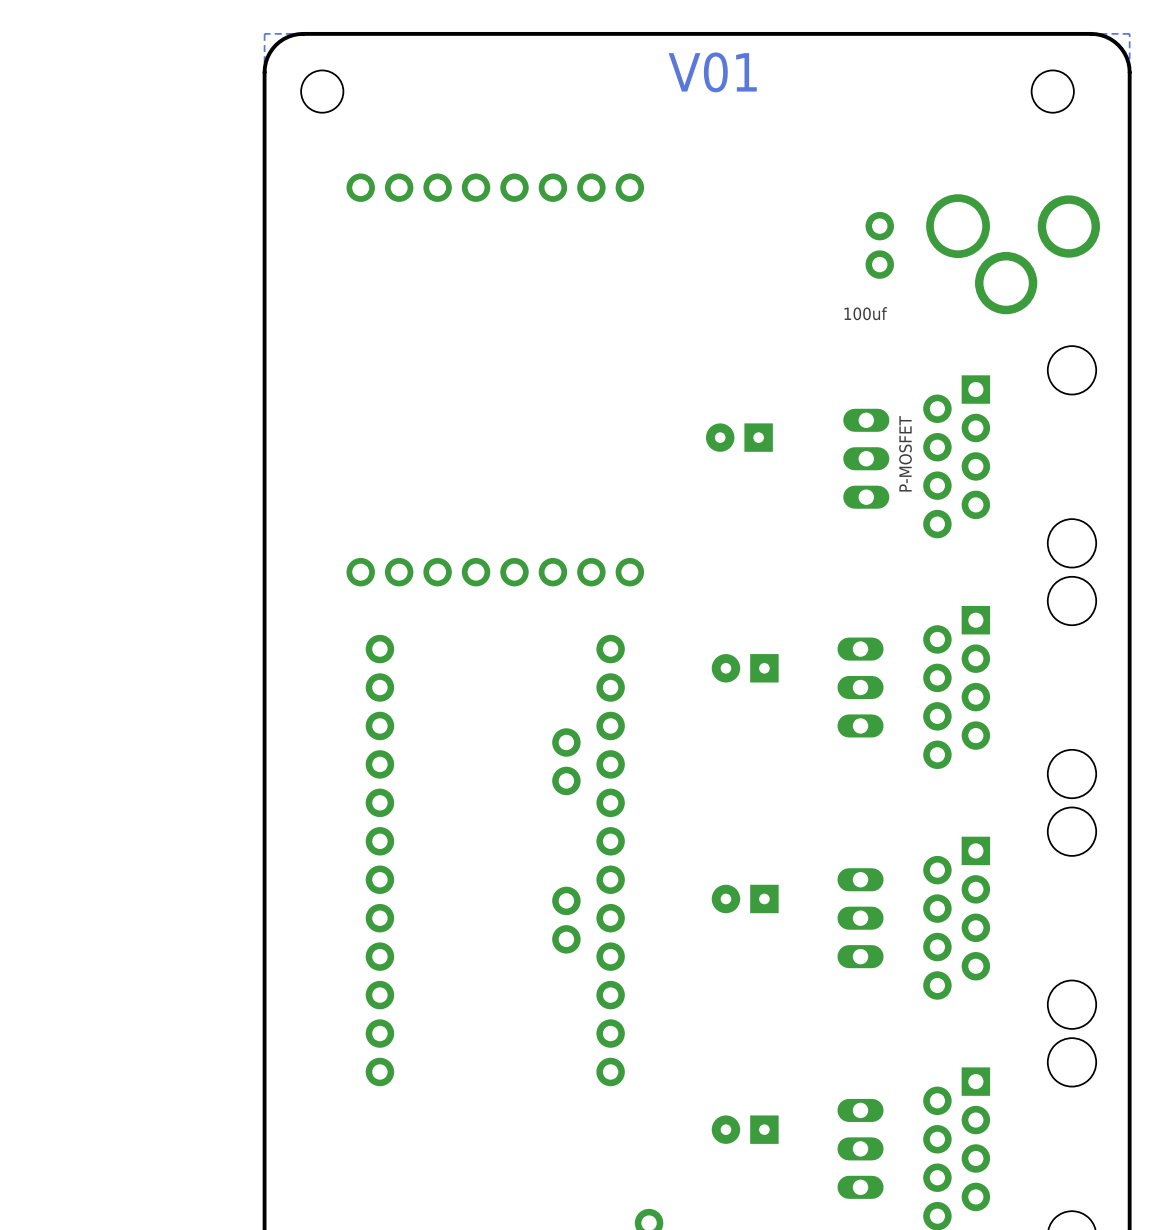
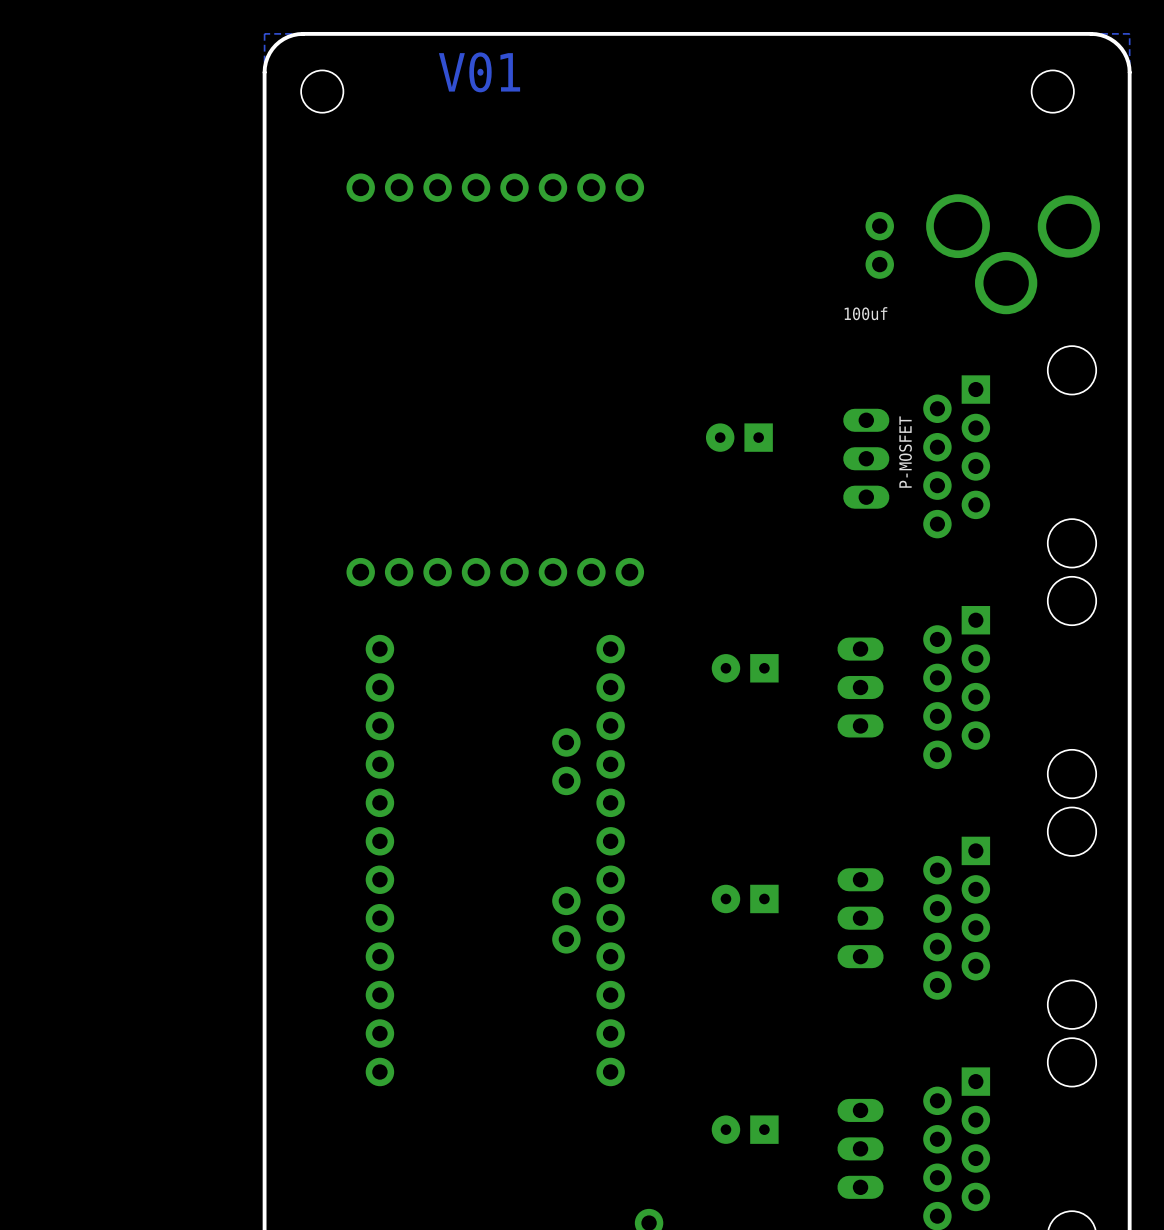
text position: V01 (712, 72) -> V01 (479, 72)

